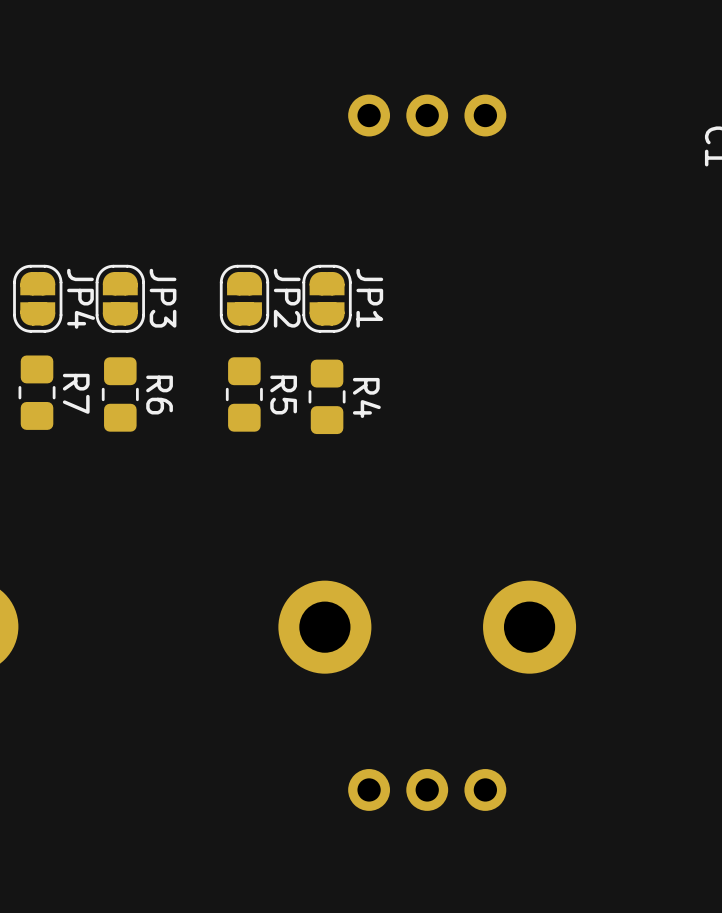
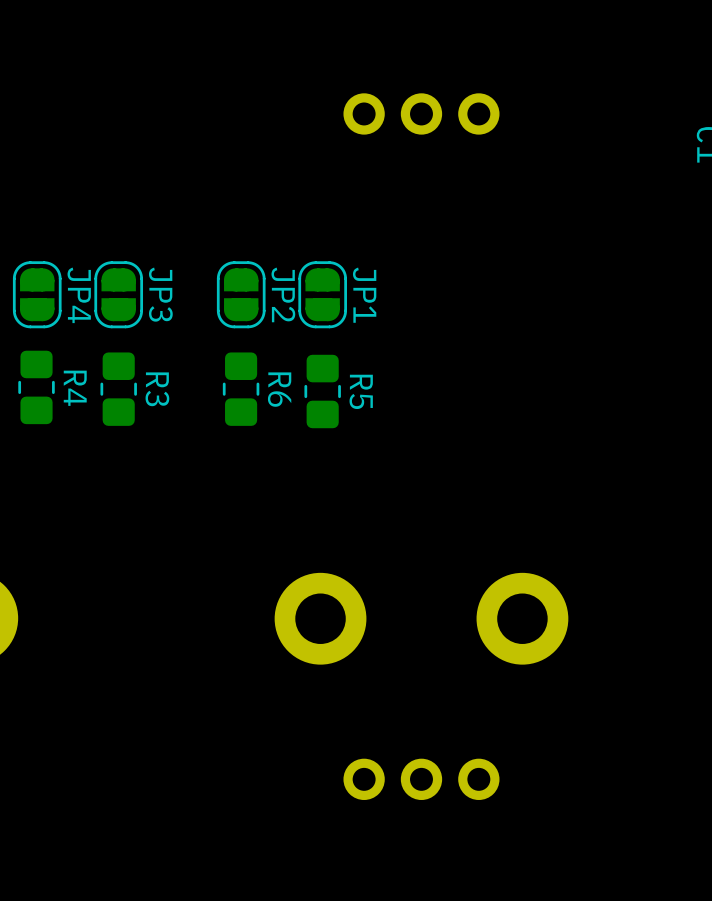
R7 name: R7 (76, 393) -> R4 (75, 388)
R6 name: R6 (159, 395) -> R3 (157, 389)
R5 name: R5 (283, 395) -> R6 (279, 389)
R4 name: R4 (366, 397) -> R5 (361, 391)

